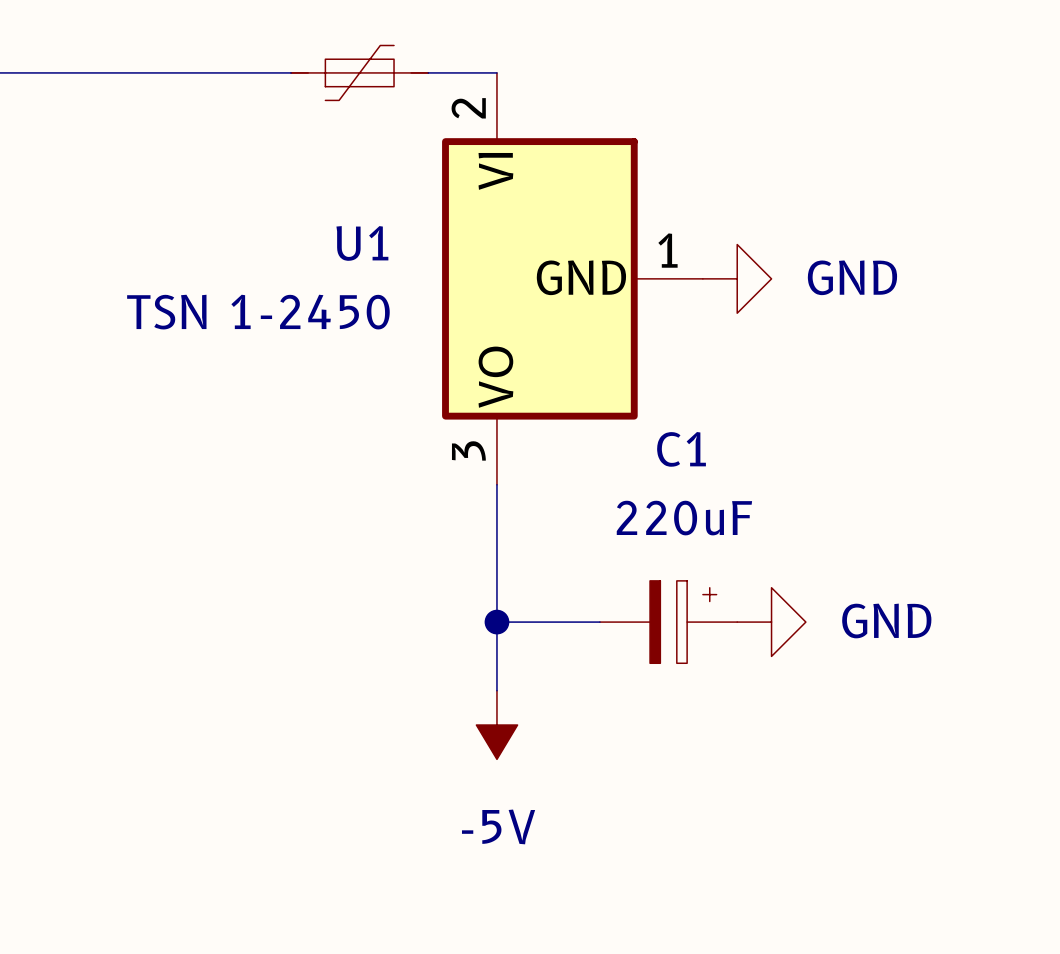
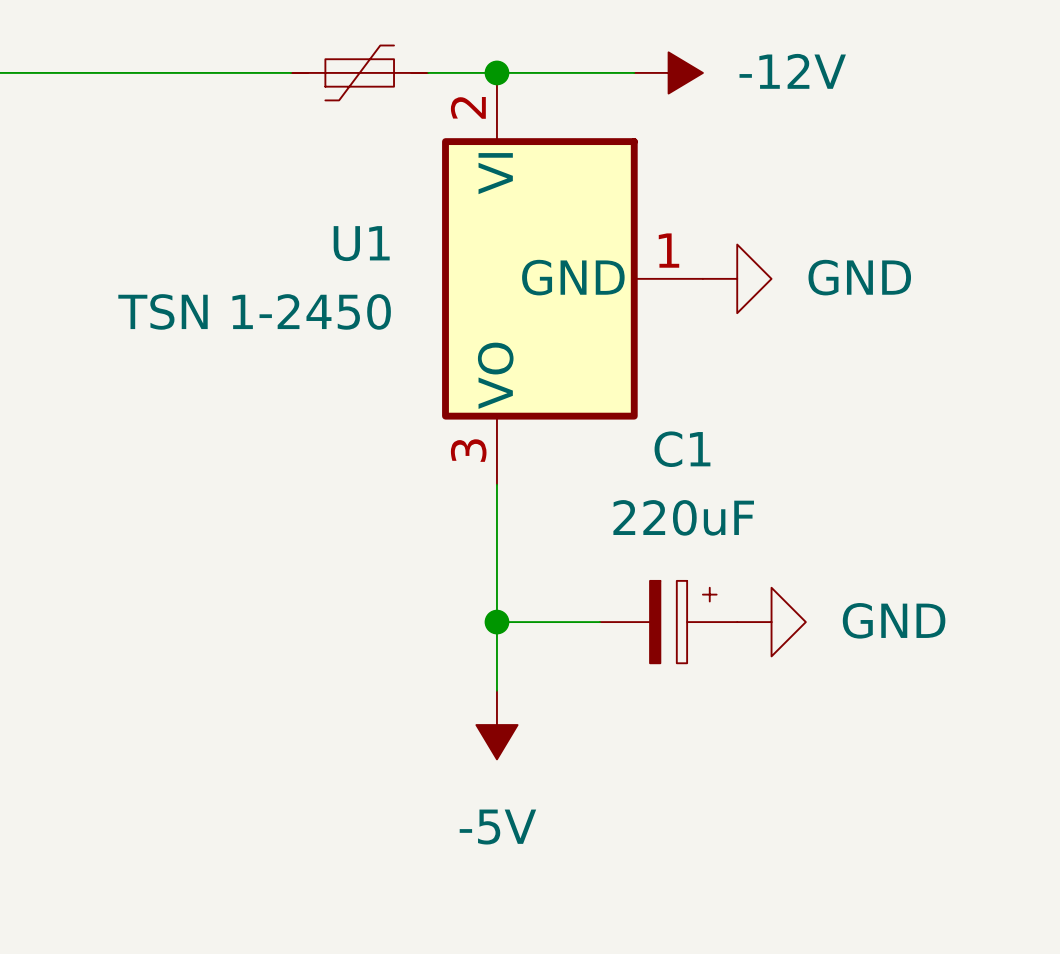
wire: none -> (496, 72) (634, 72)
junction: none -> (496, 72)
power symbol: none -> -12V (668, 72)

